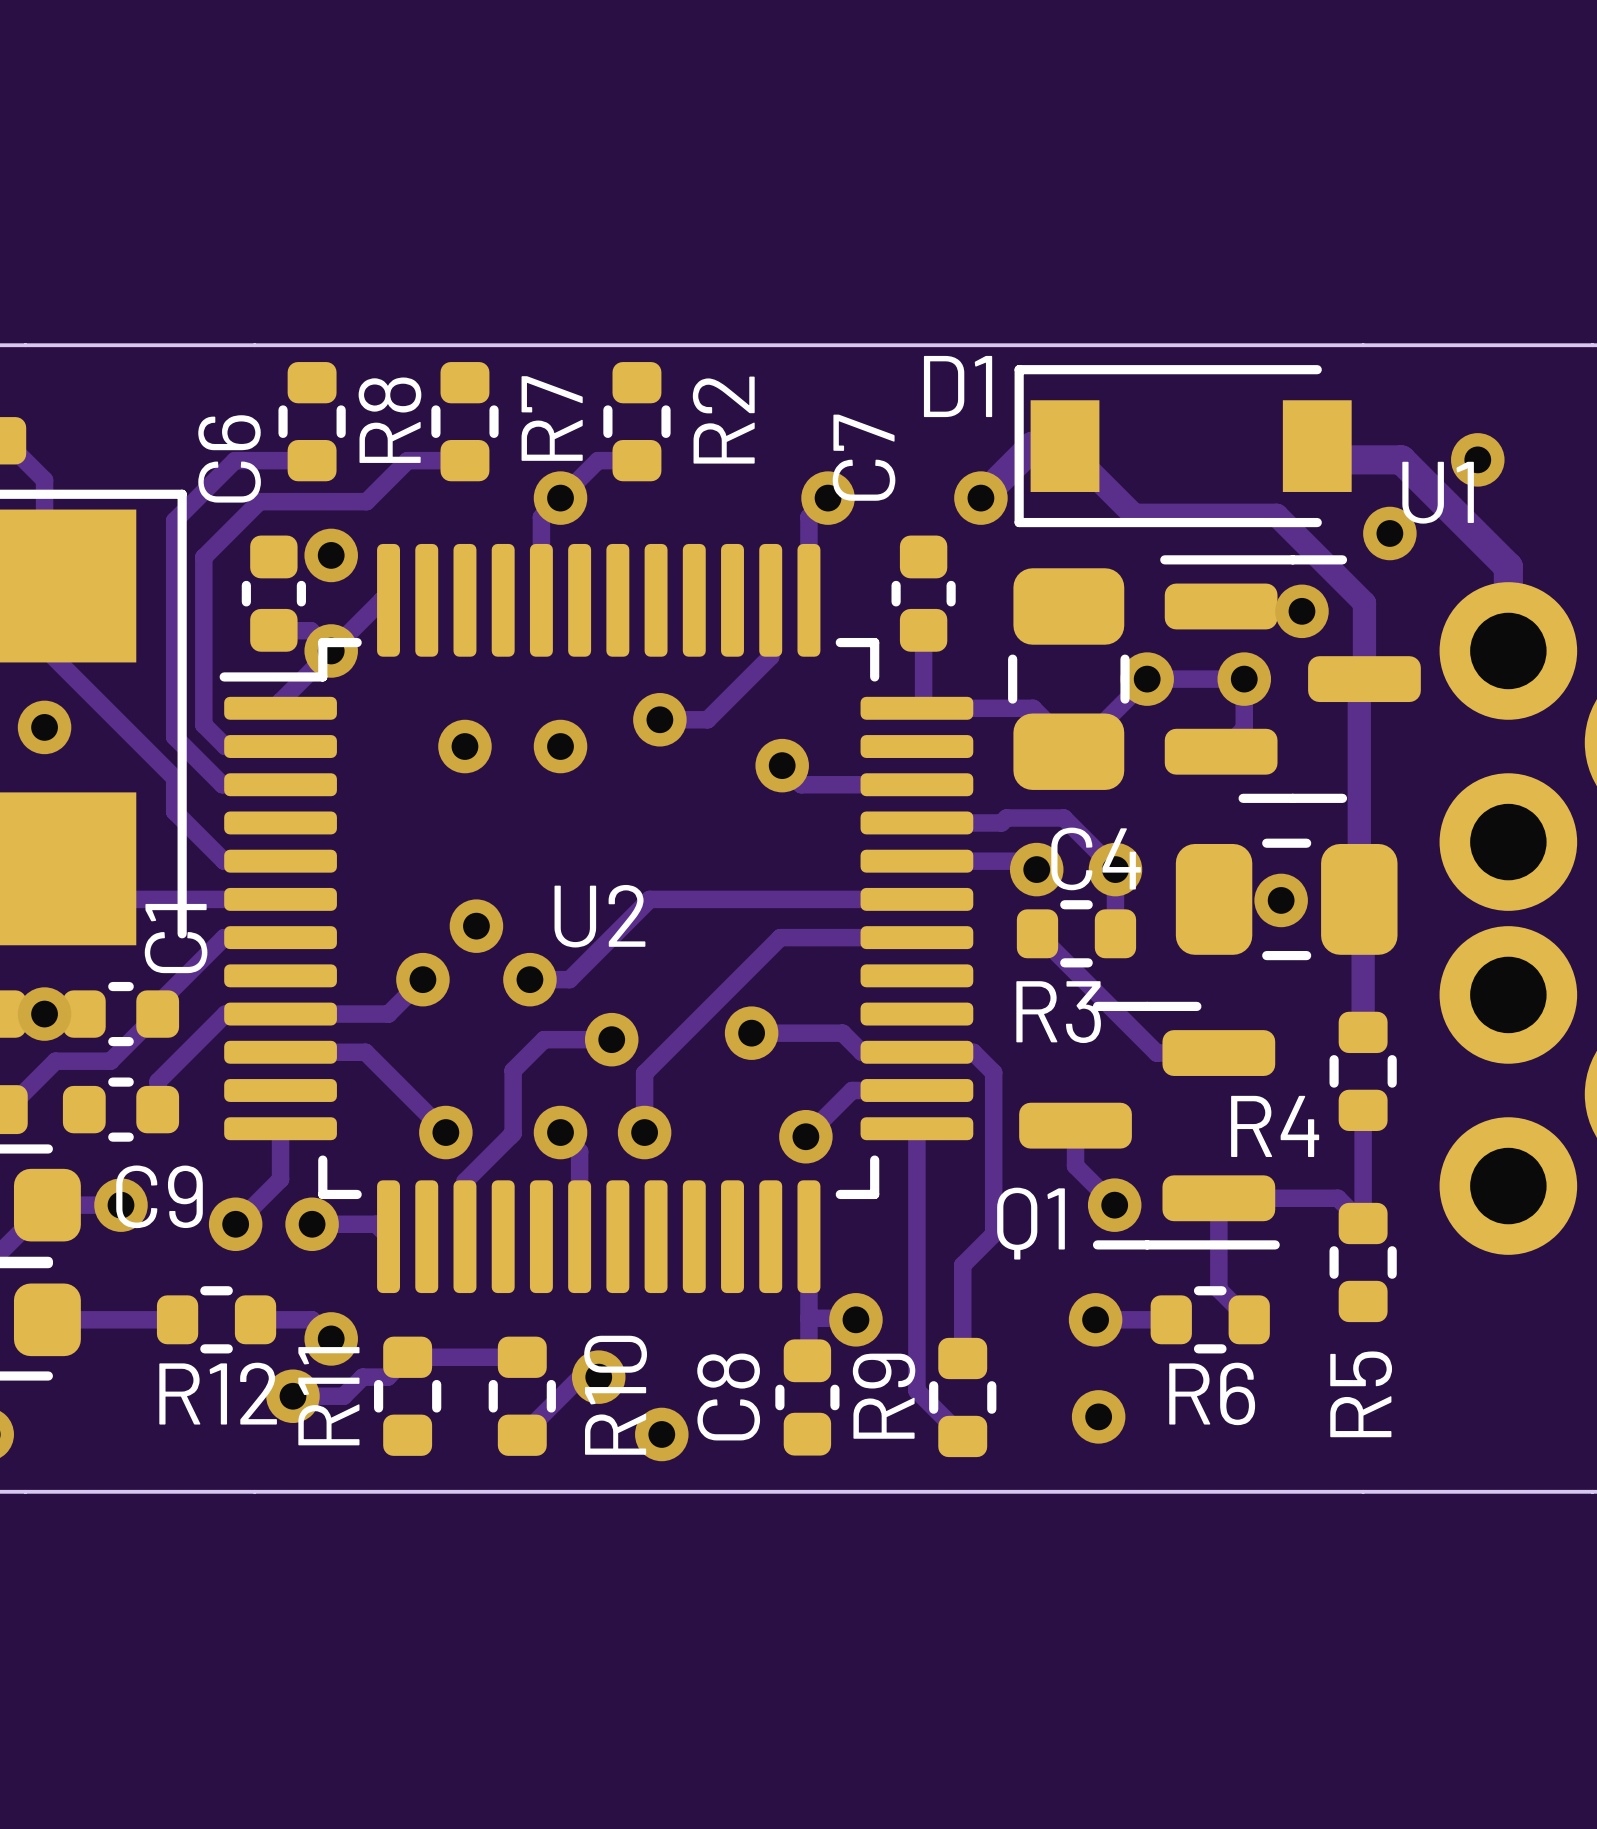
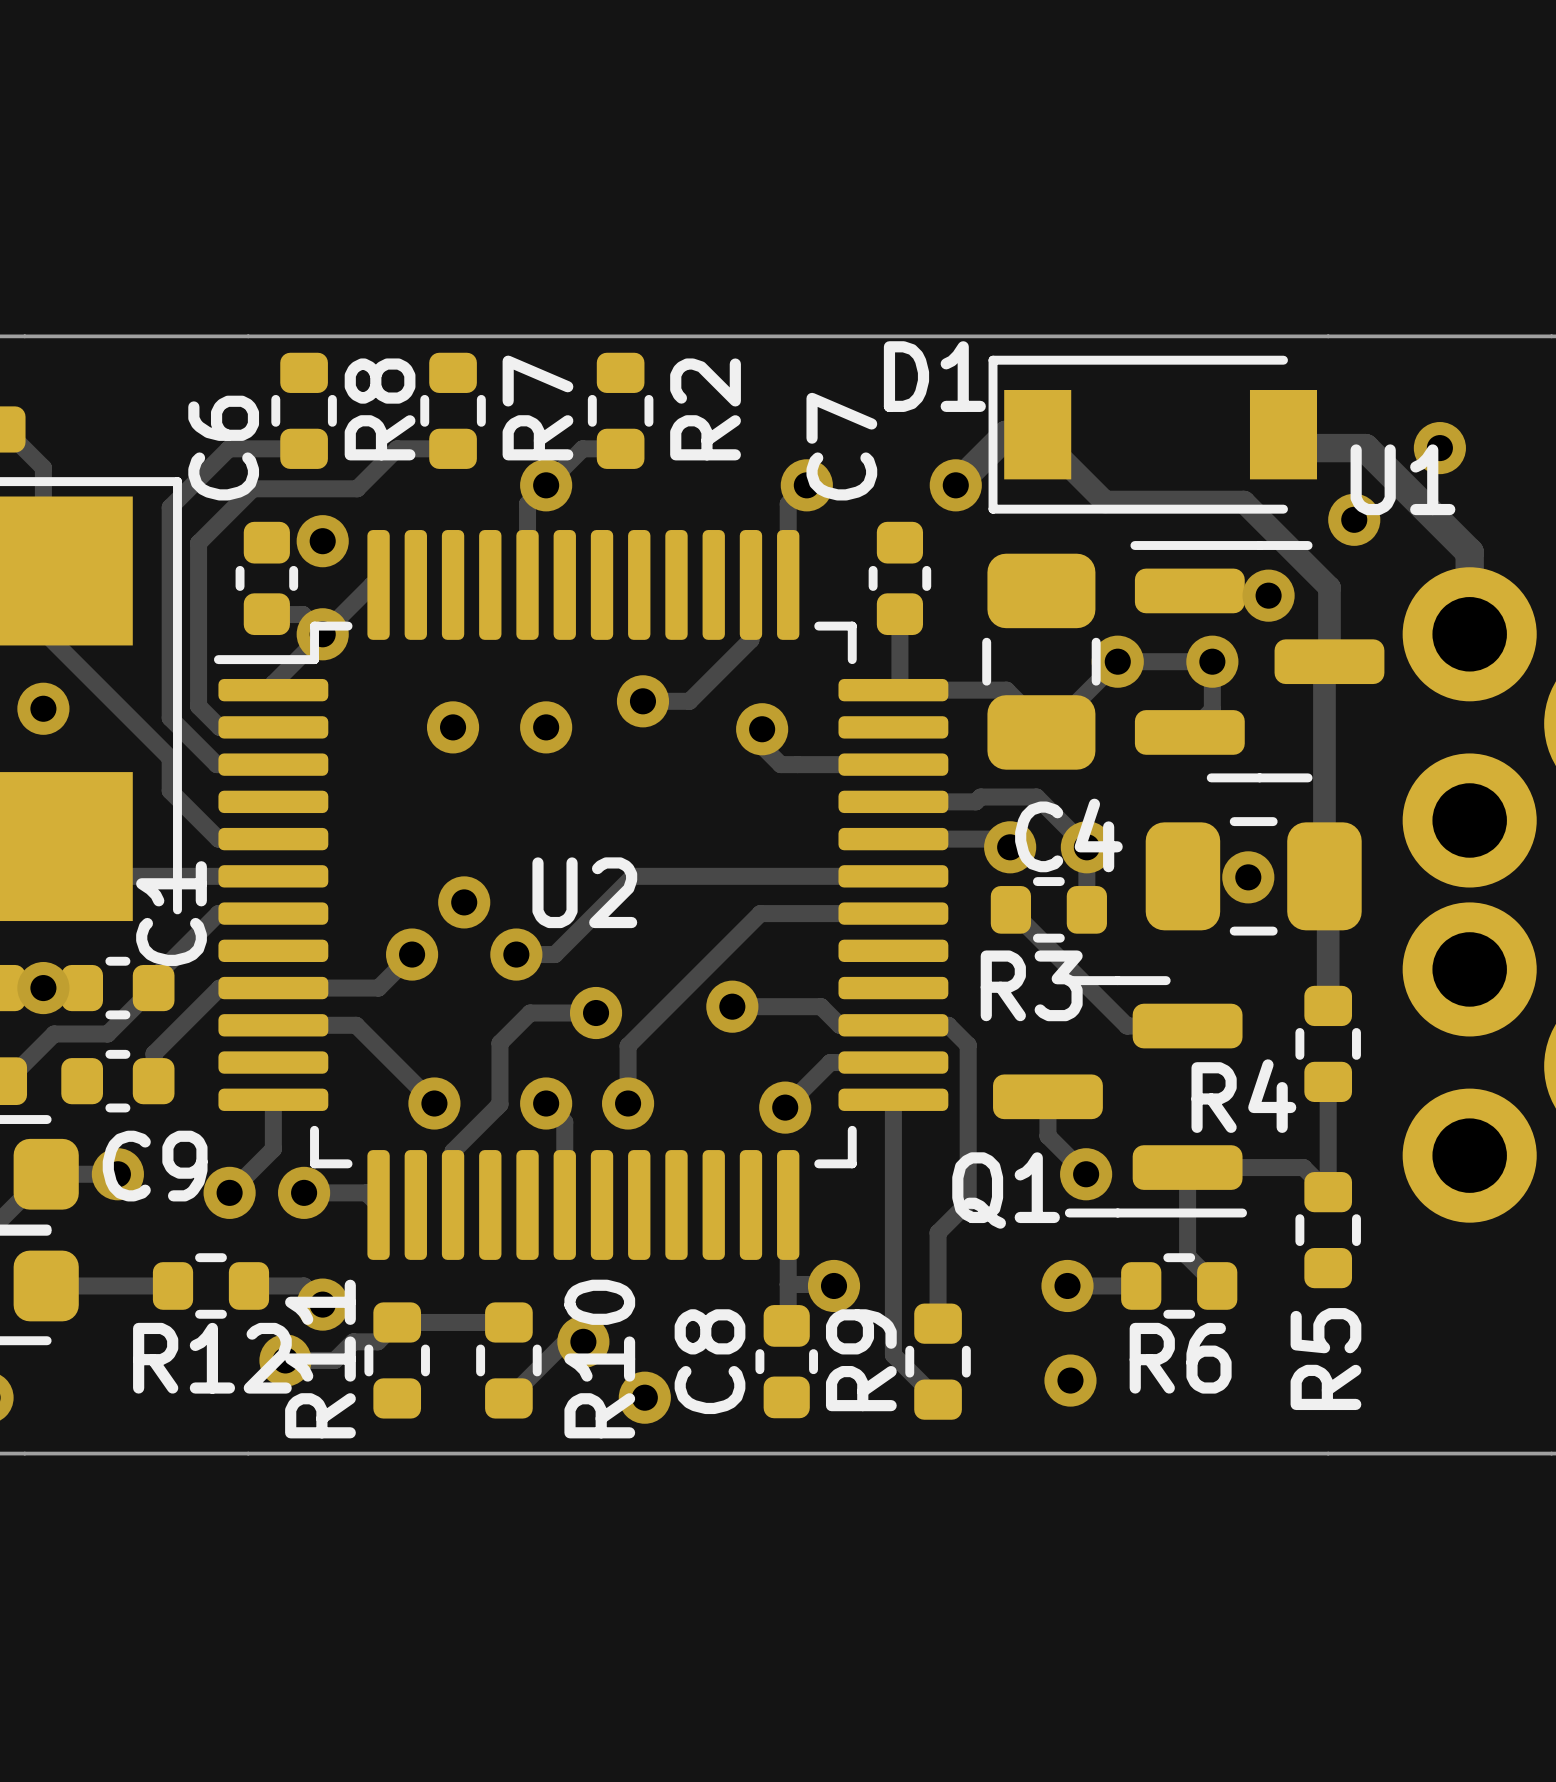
via position: (782, 765) -> (762, 729)

